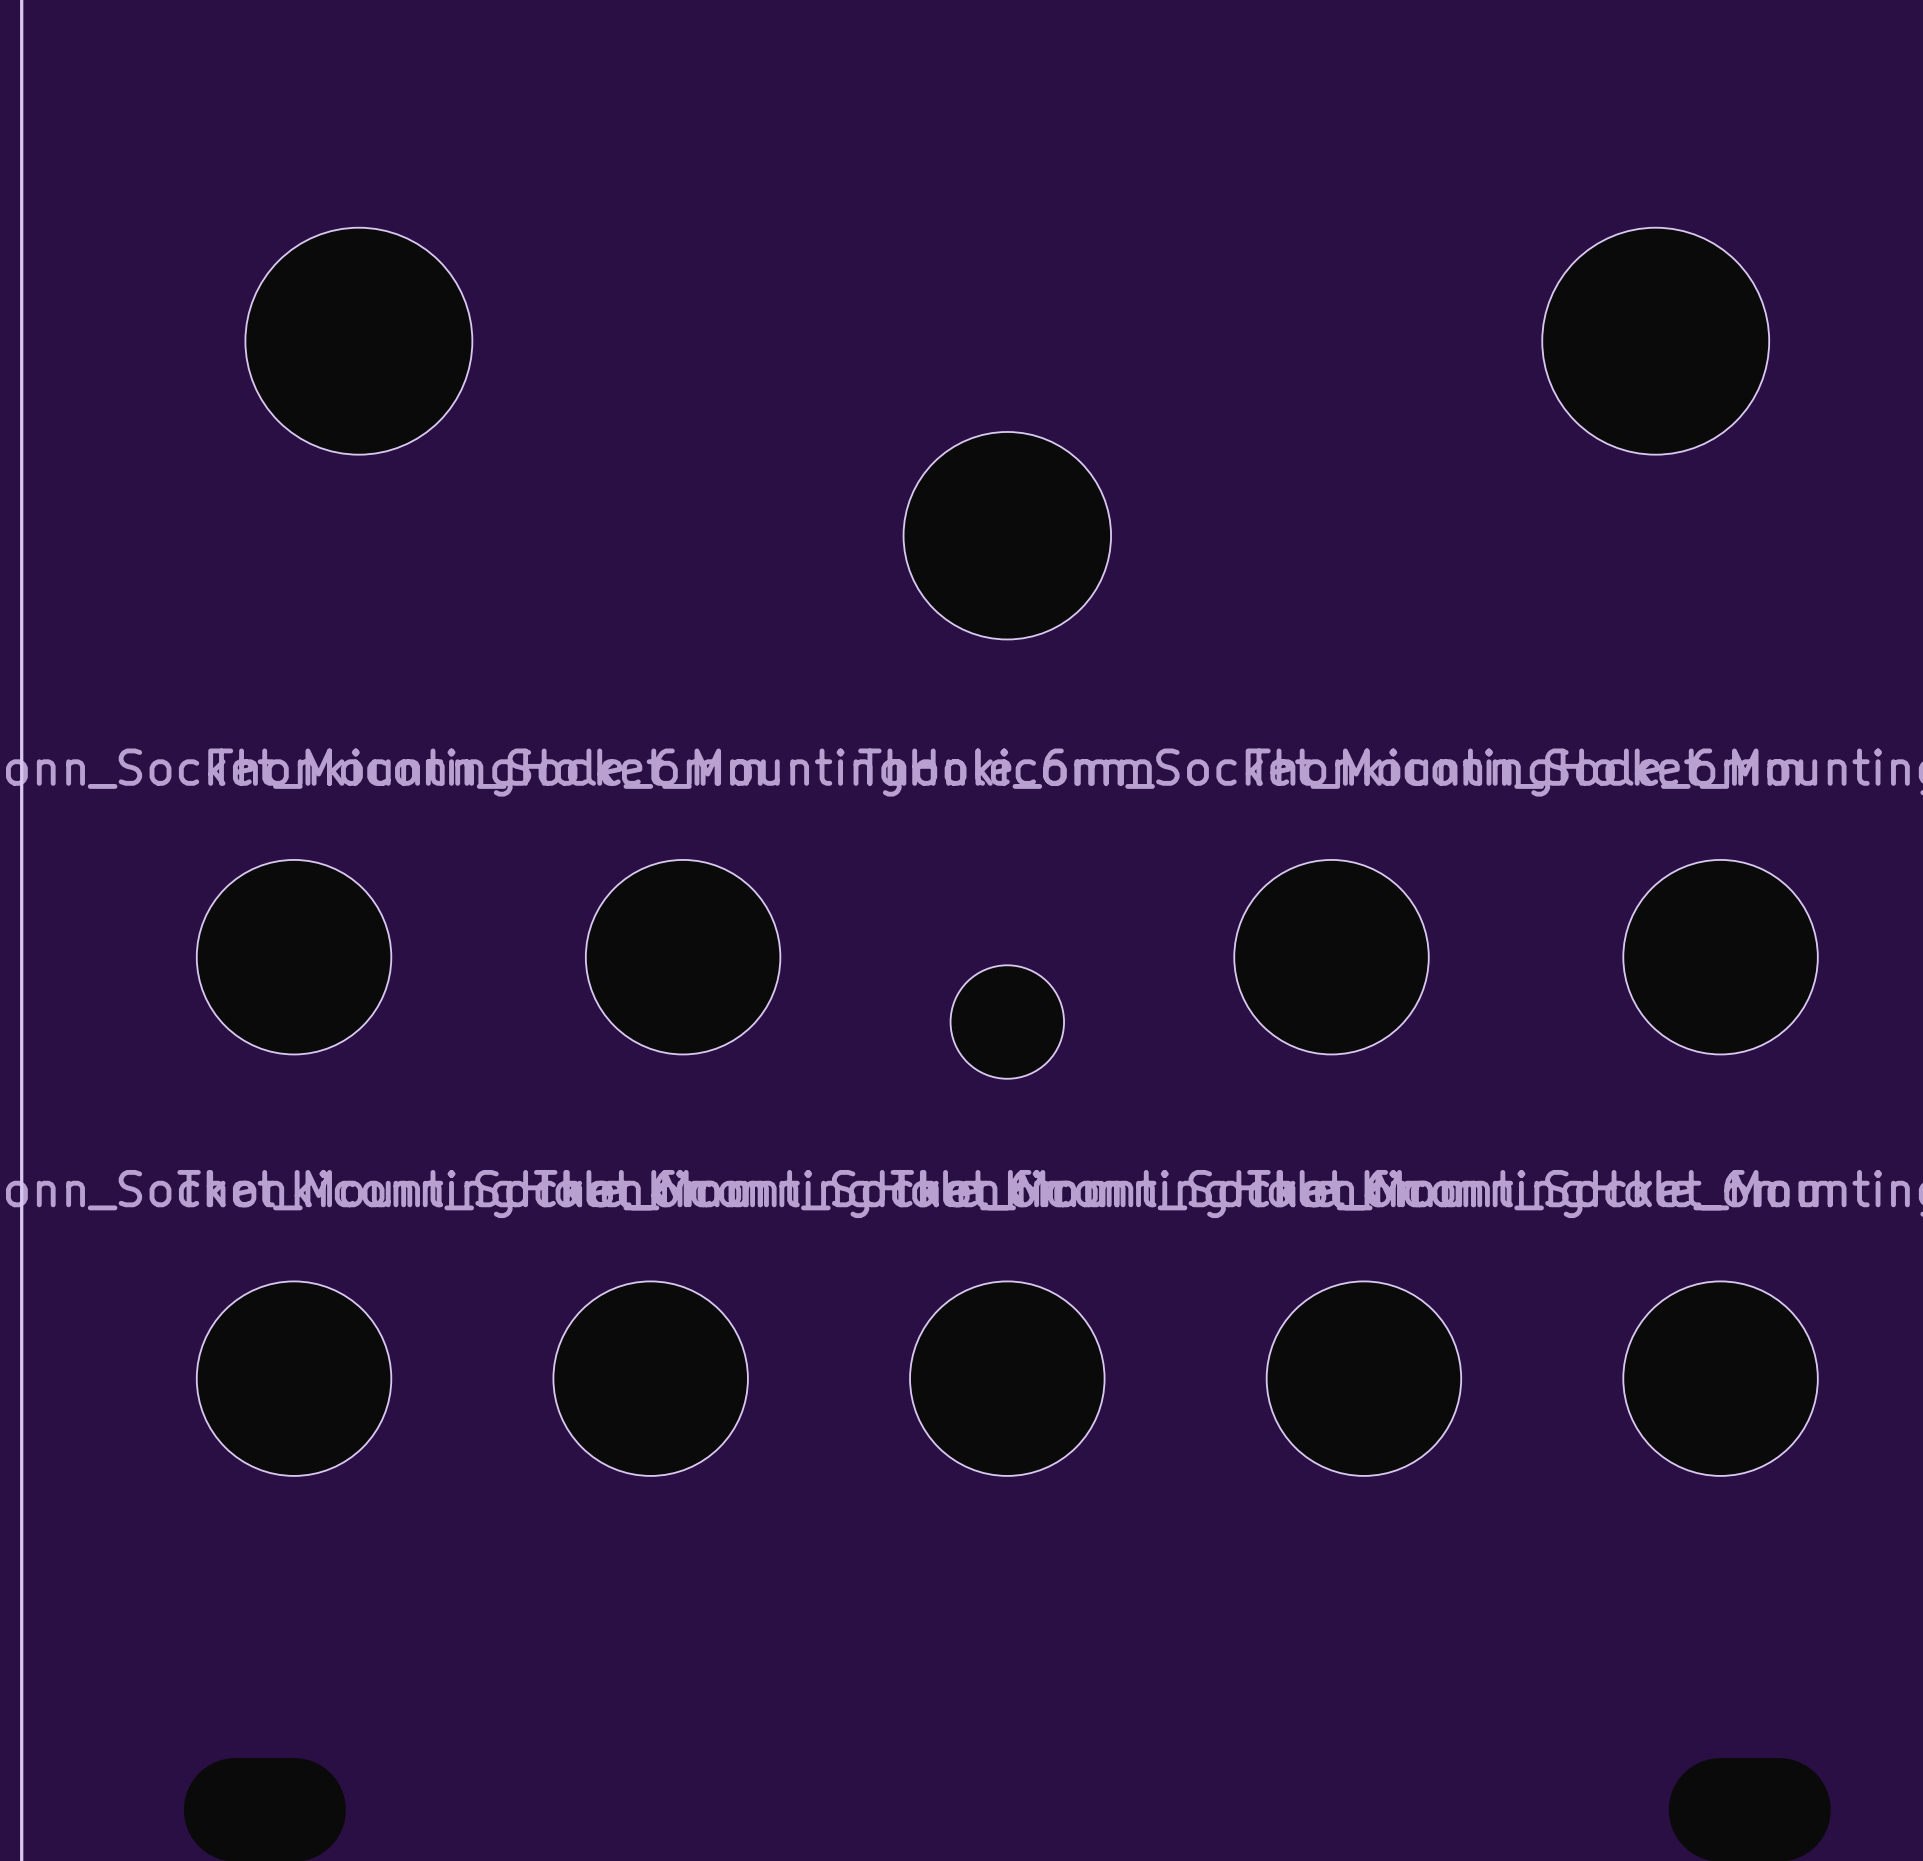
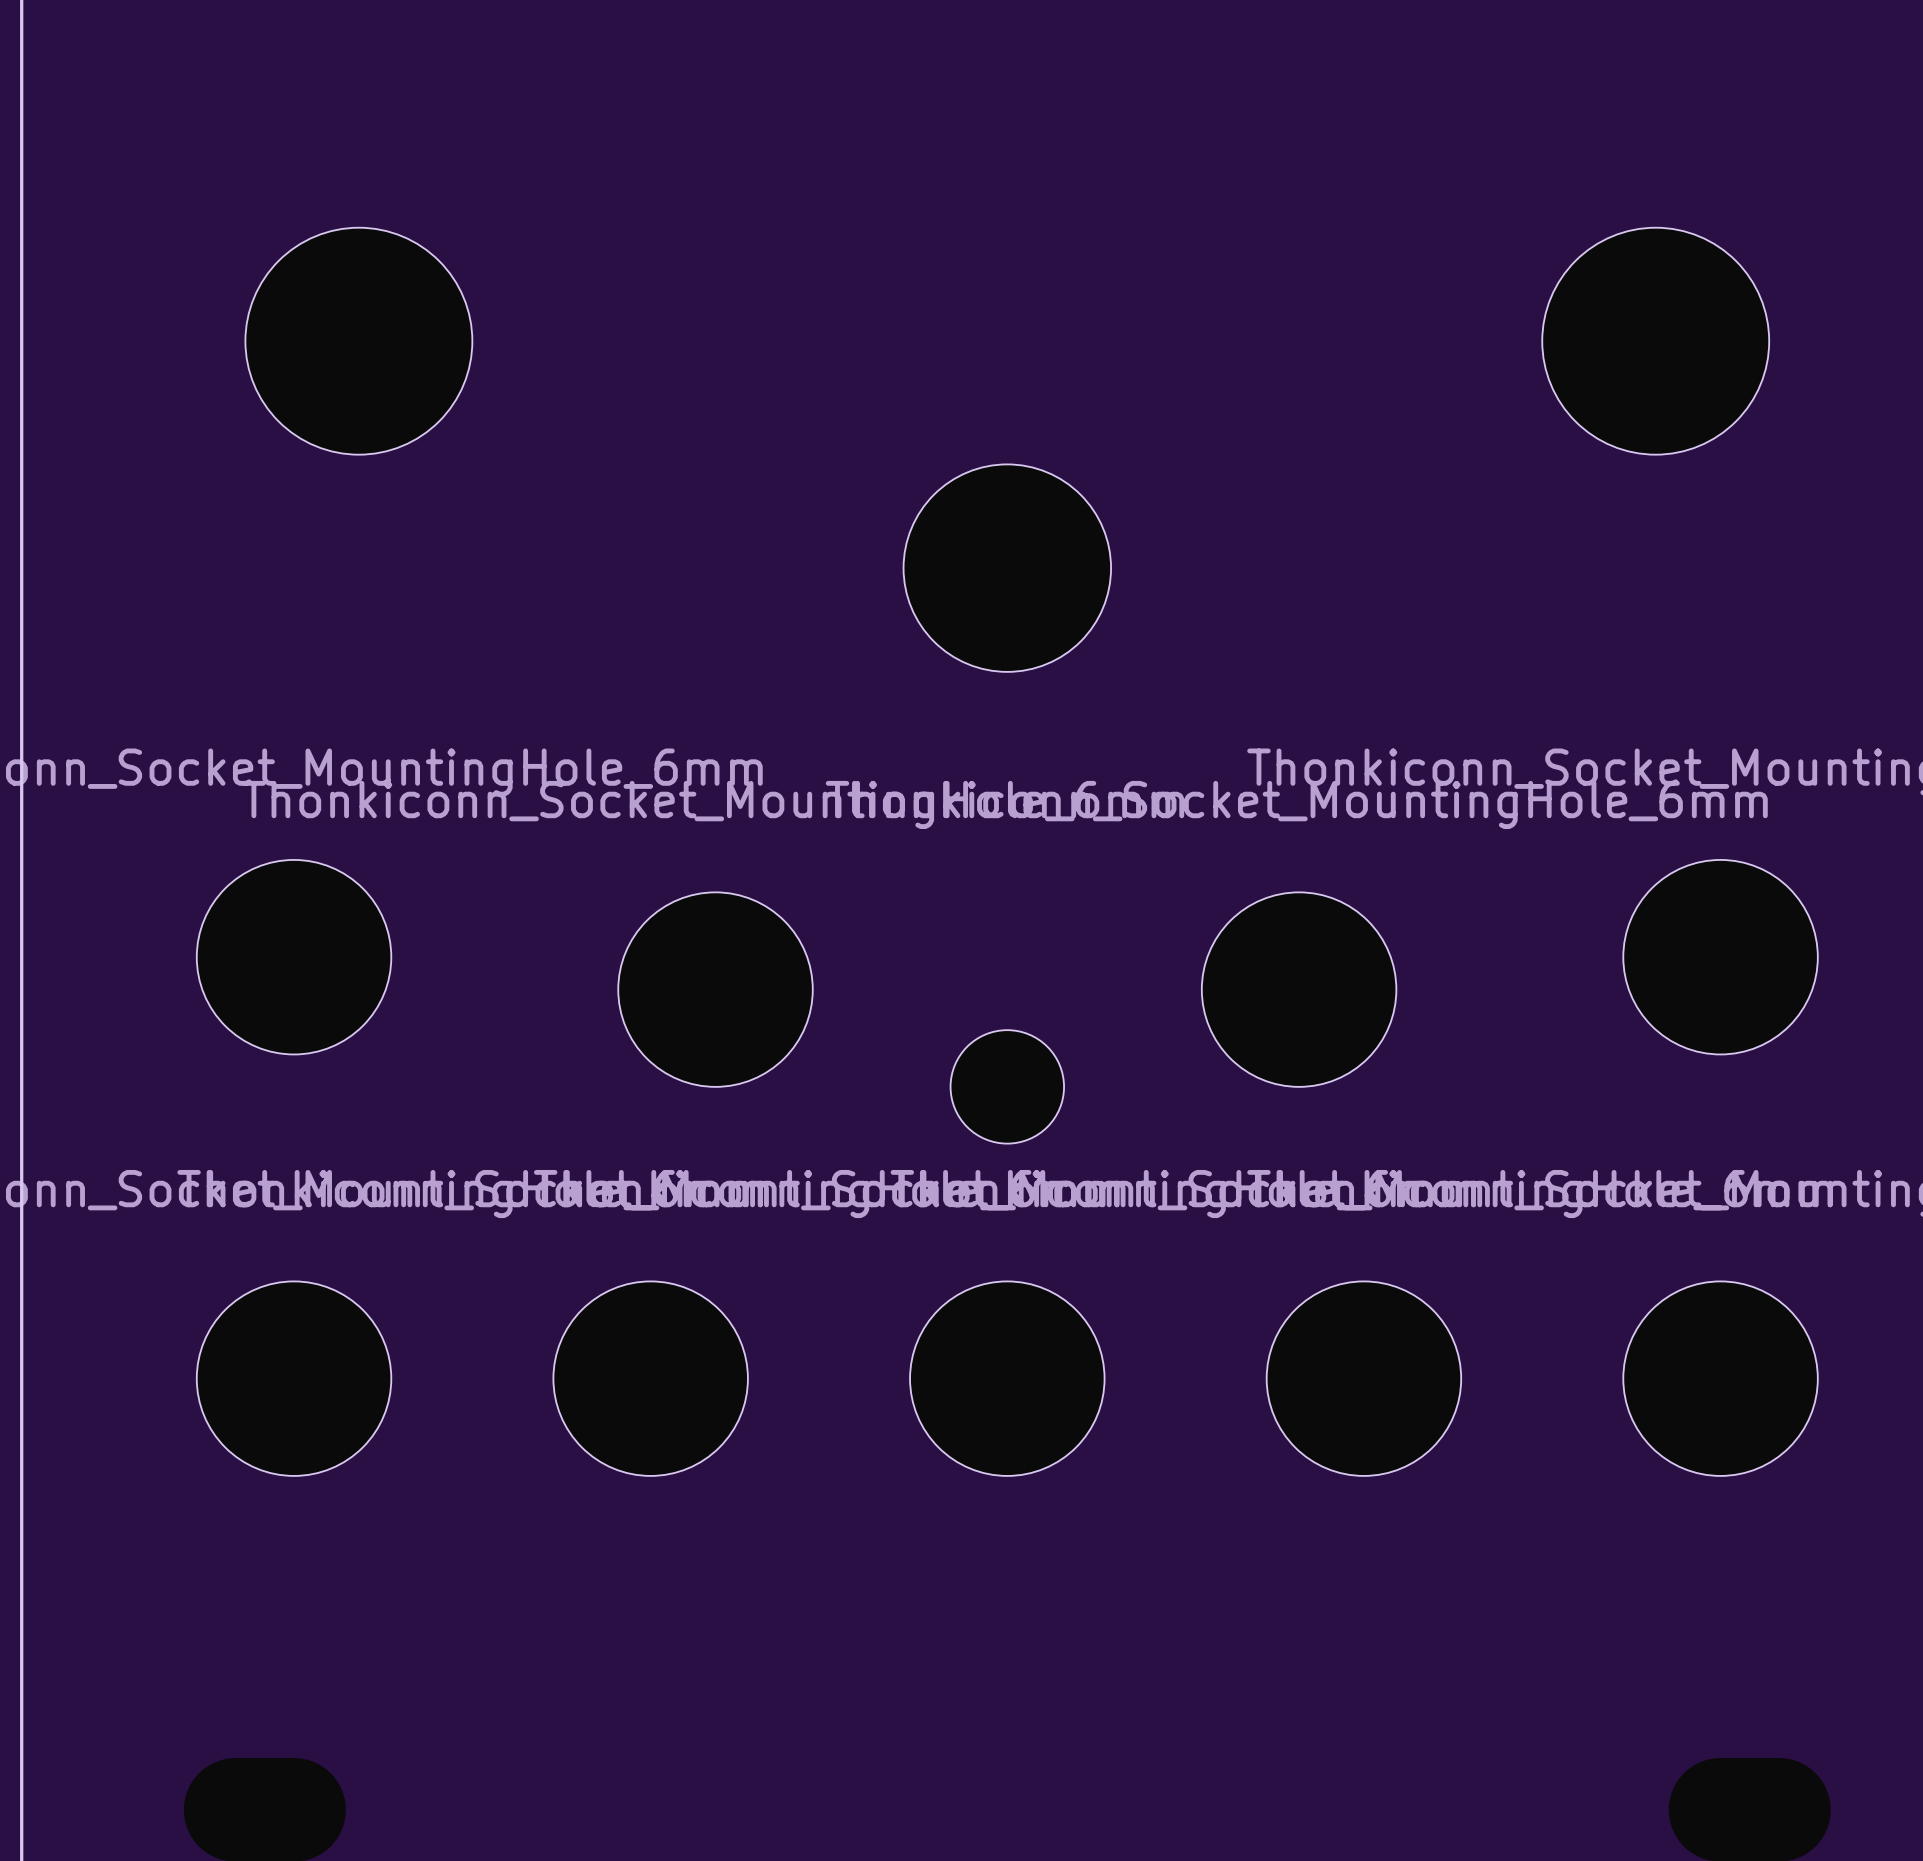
part position: (1007, 535) -> (1007, 568)
part position: (683, 957) -> (715, 989)
part position: (1331, 957) -> (1299, 989)
part position: (1007, 1022) -> (1007, 1086)

